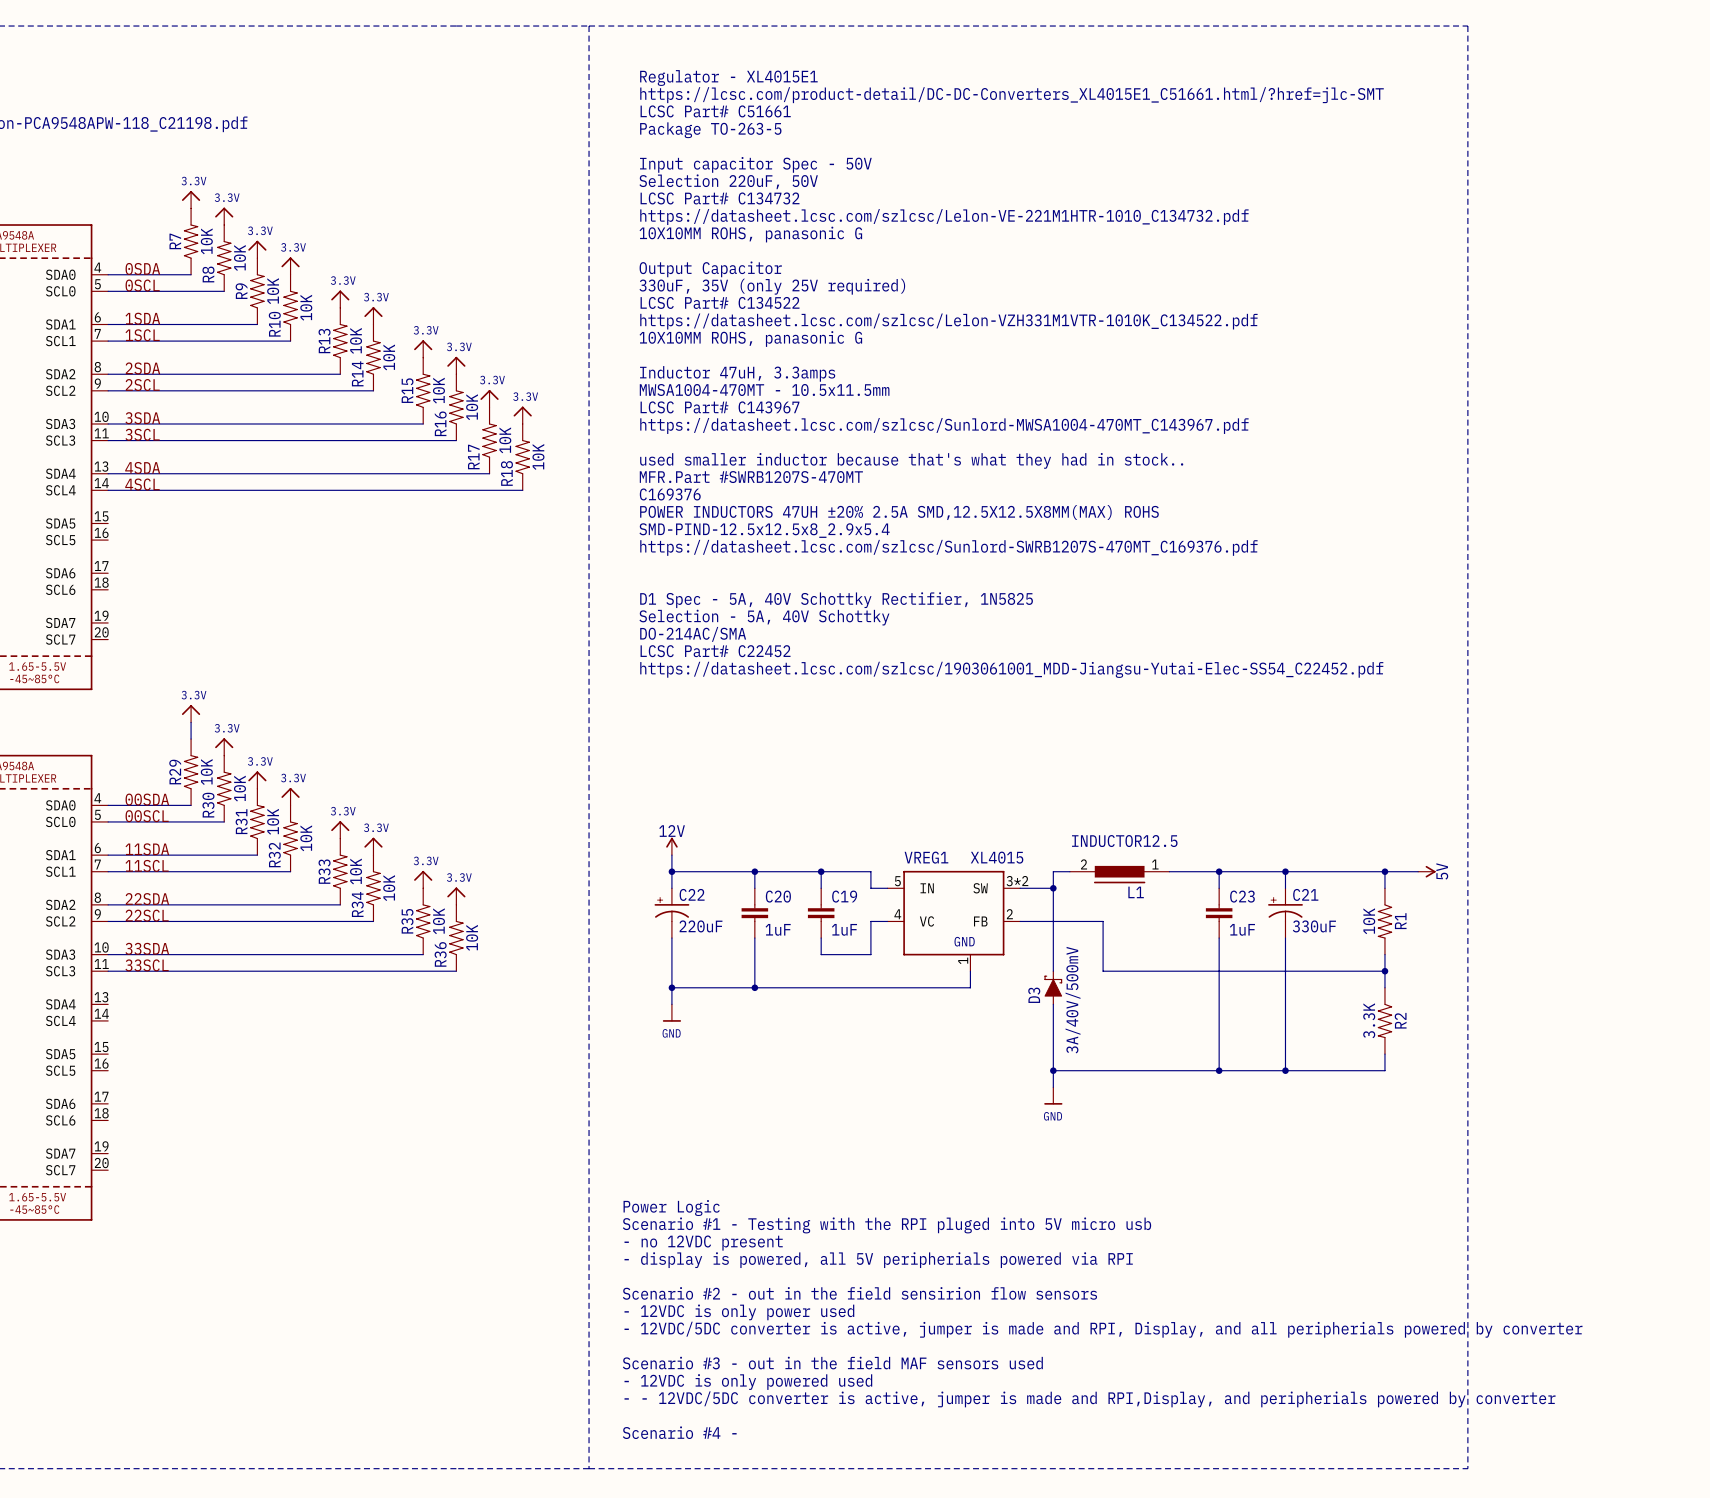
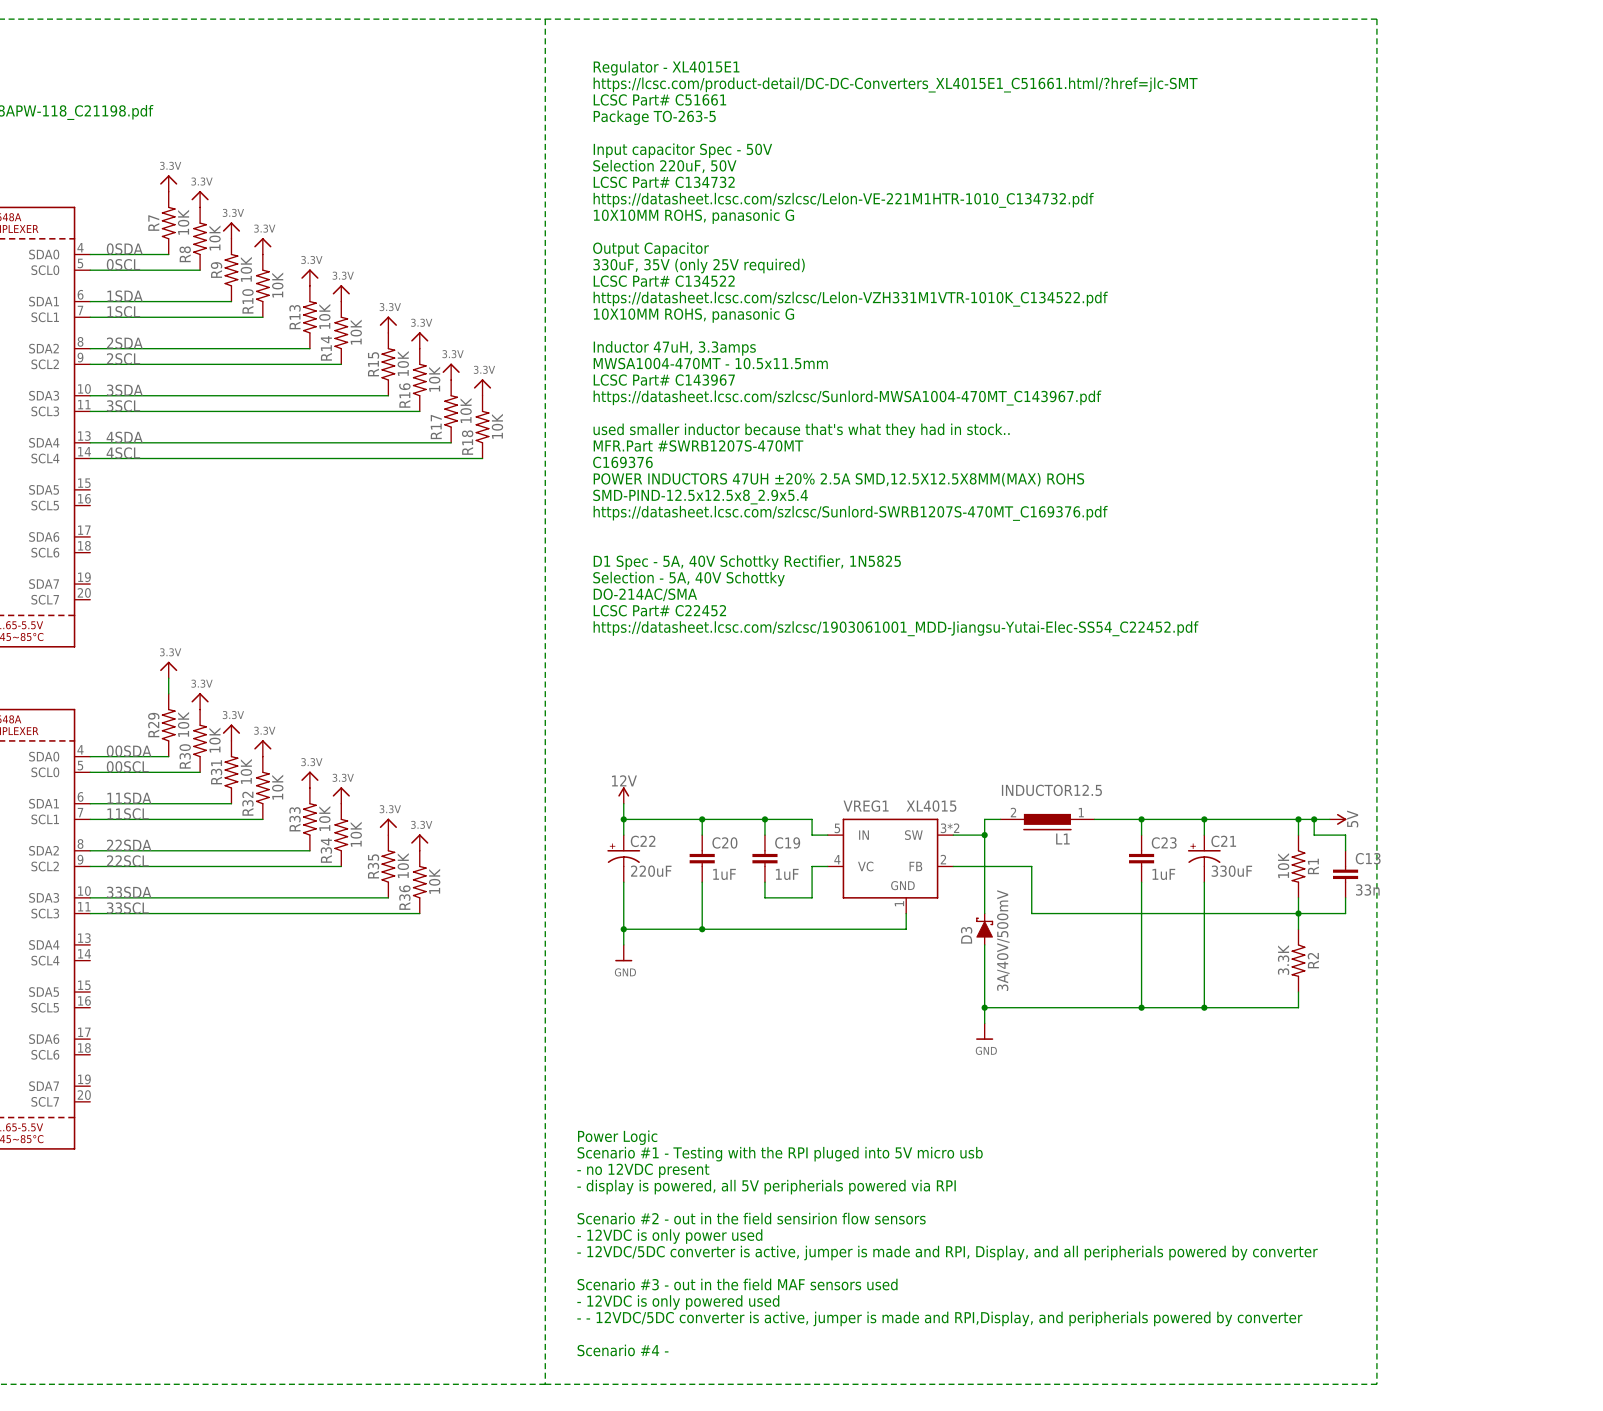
wire: none -> (1314, 819) (1314, 835) (1345, 835) (1345, 850)
junction: none -> (1314, 819)
C13: none -> 33n (1345, 874)
wire: none -> (1345, 897) (1345, 913) (1298, 913)

